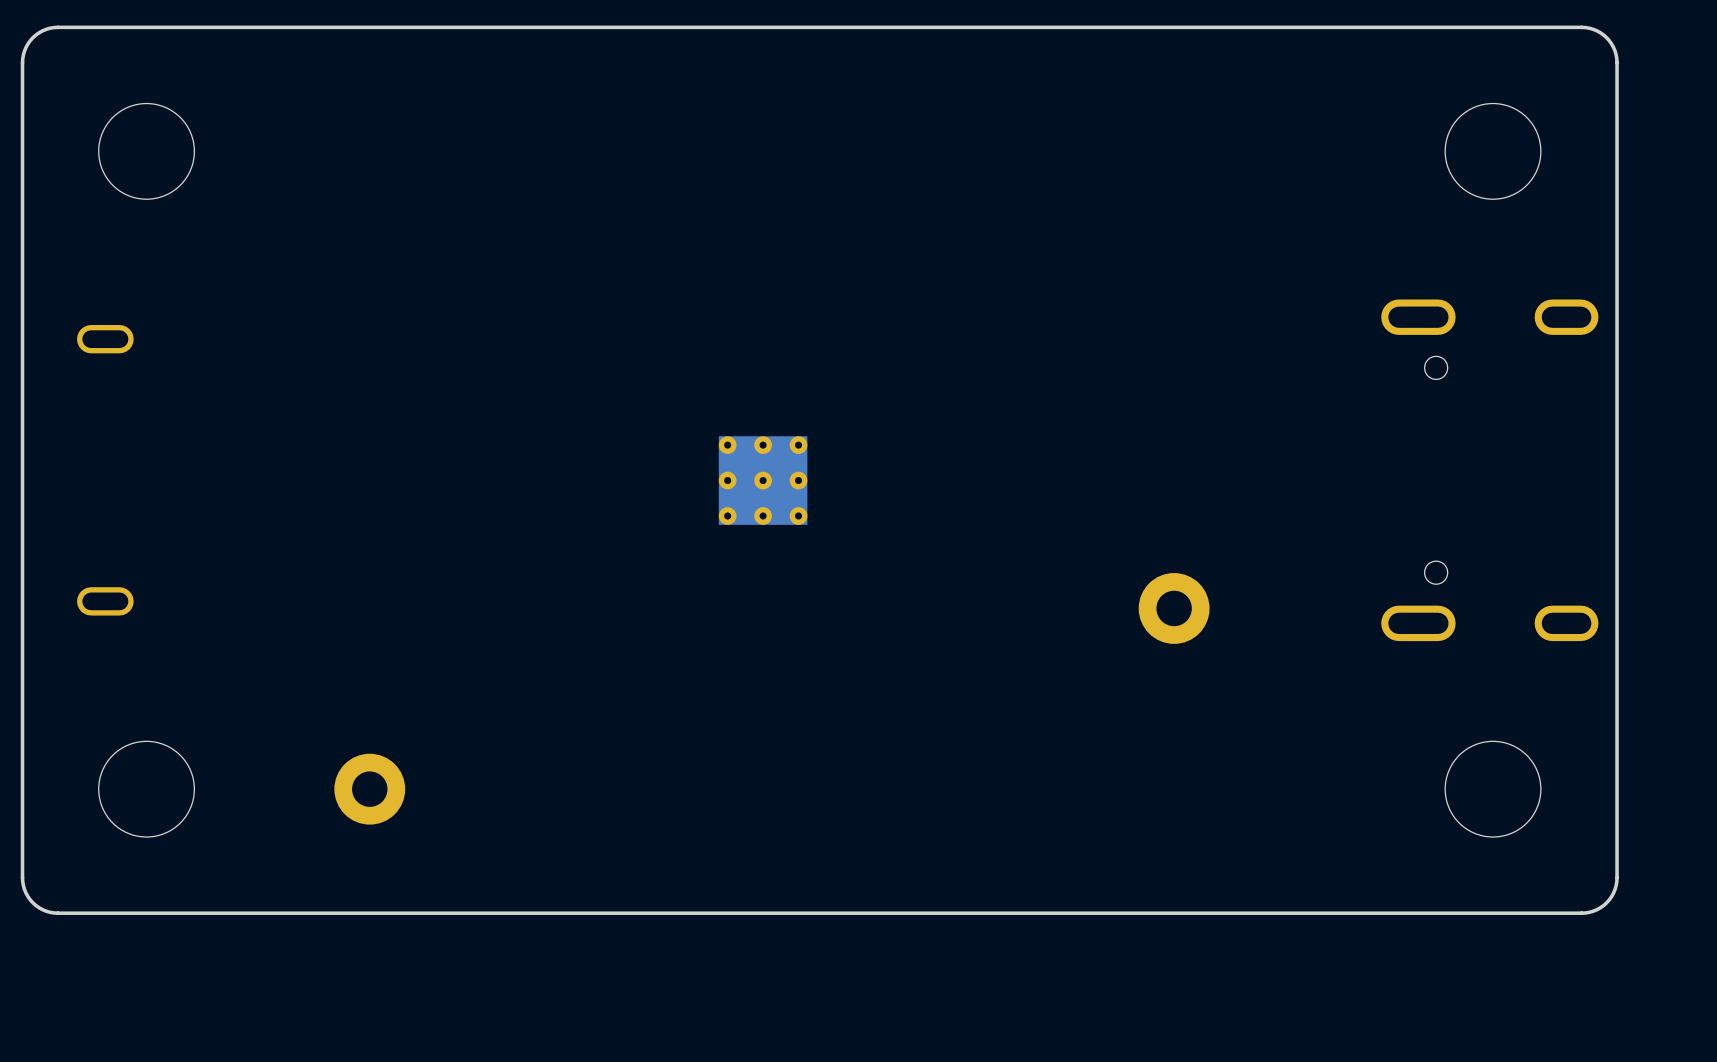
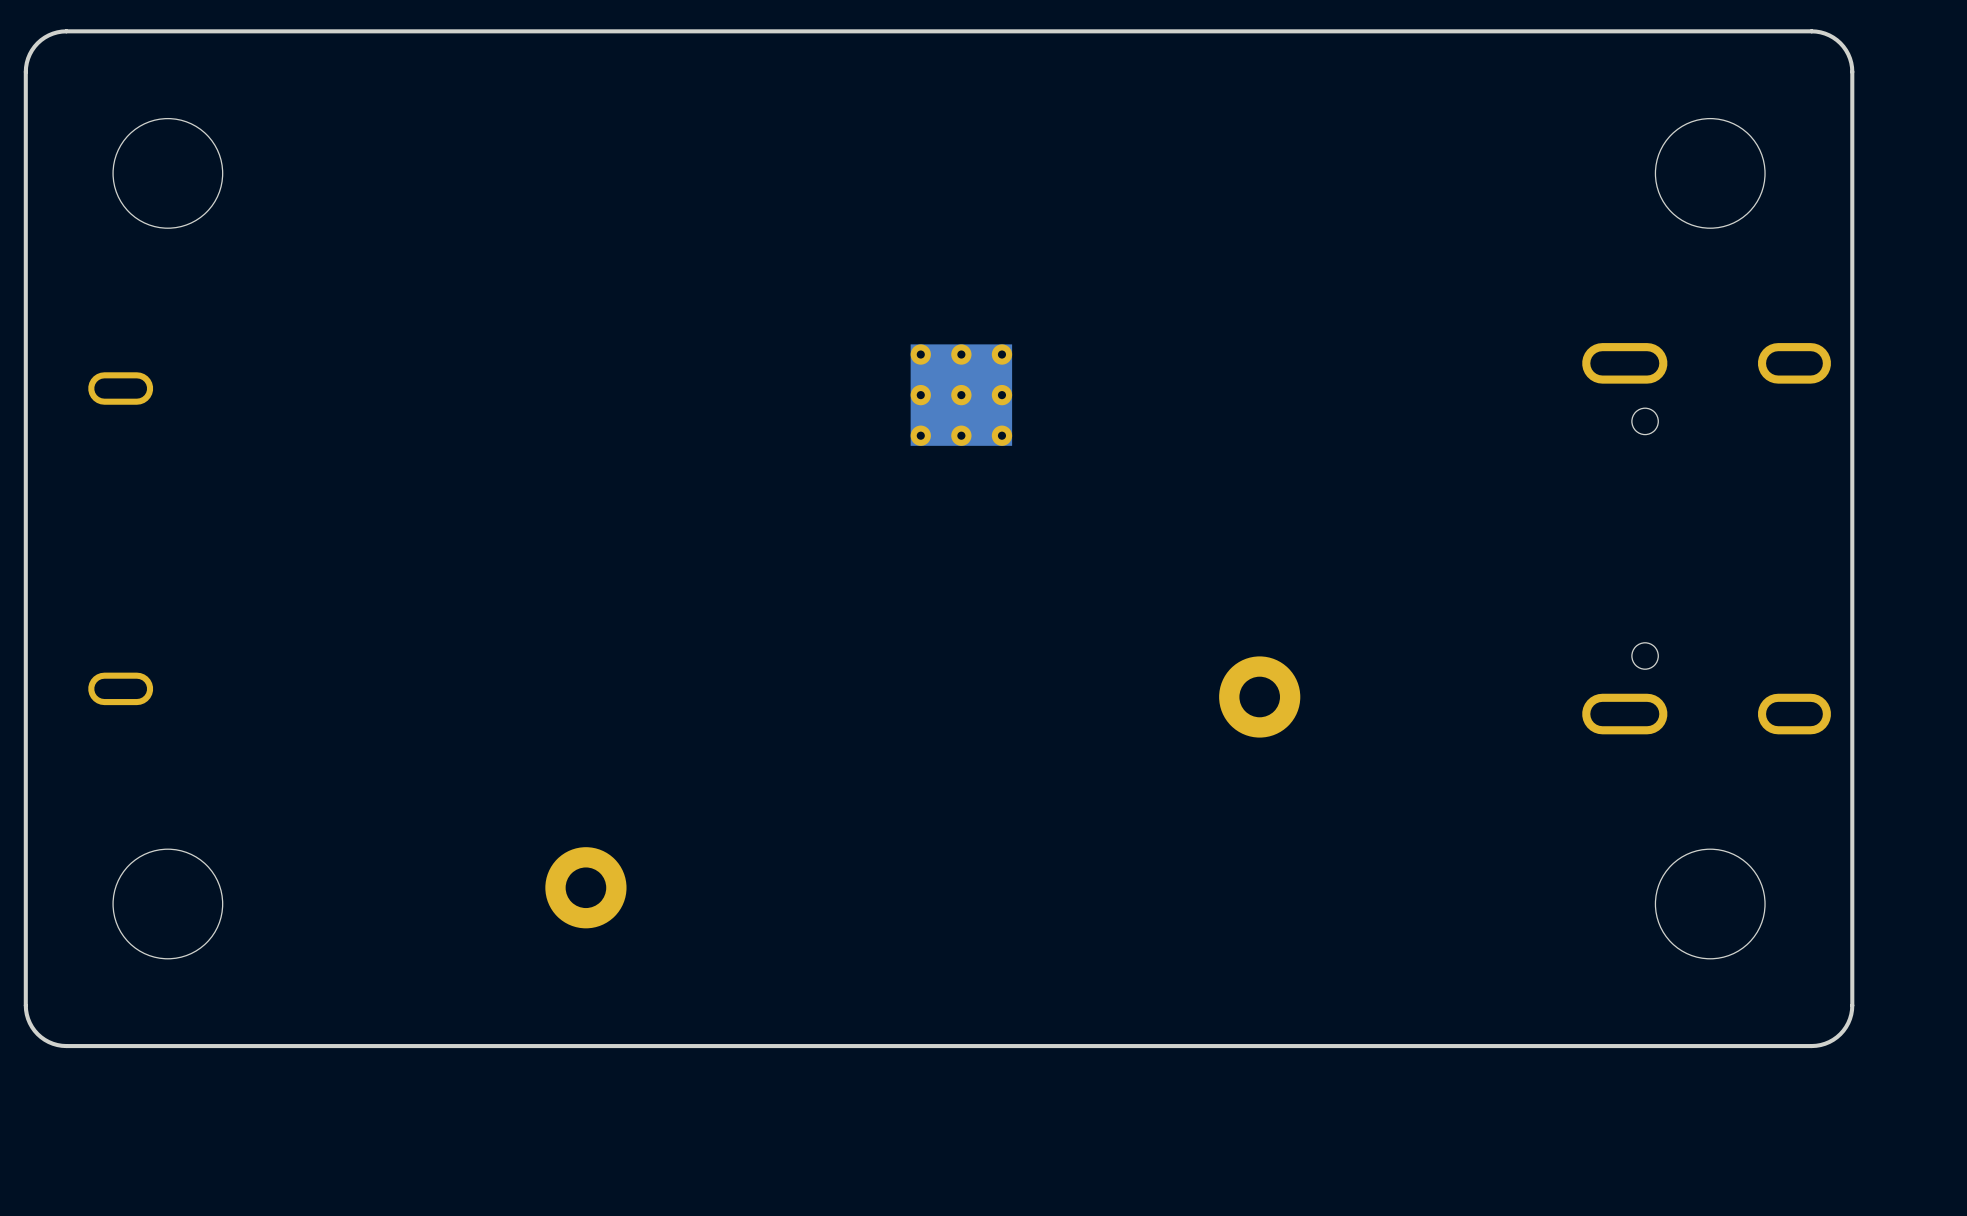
part position: (763, 480) -> (961, 395)
part position: (1174, 608) -> (1259, 696)
part position: (369, 789) -> (585, 887)

